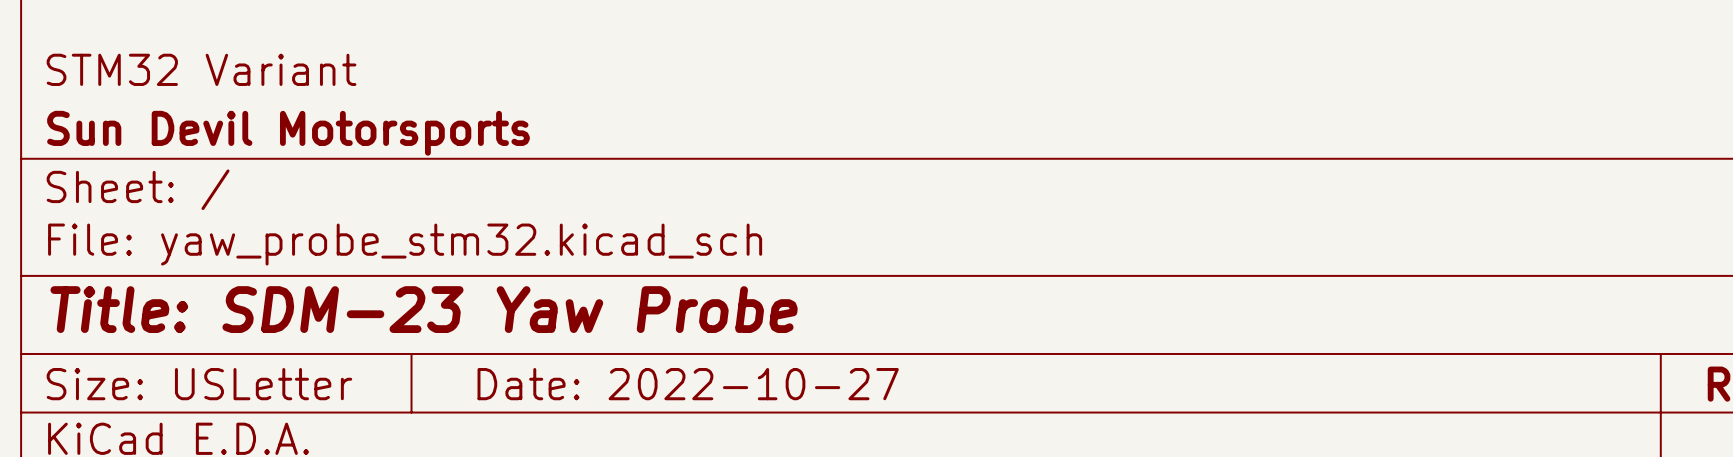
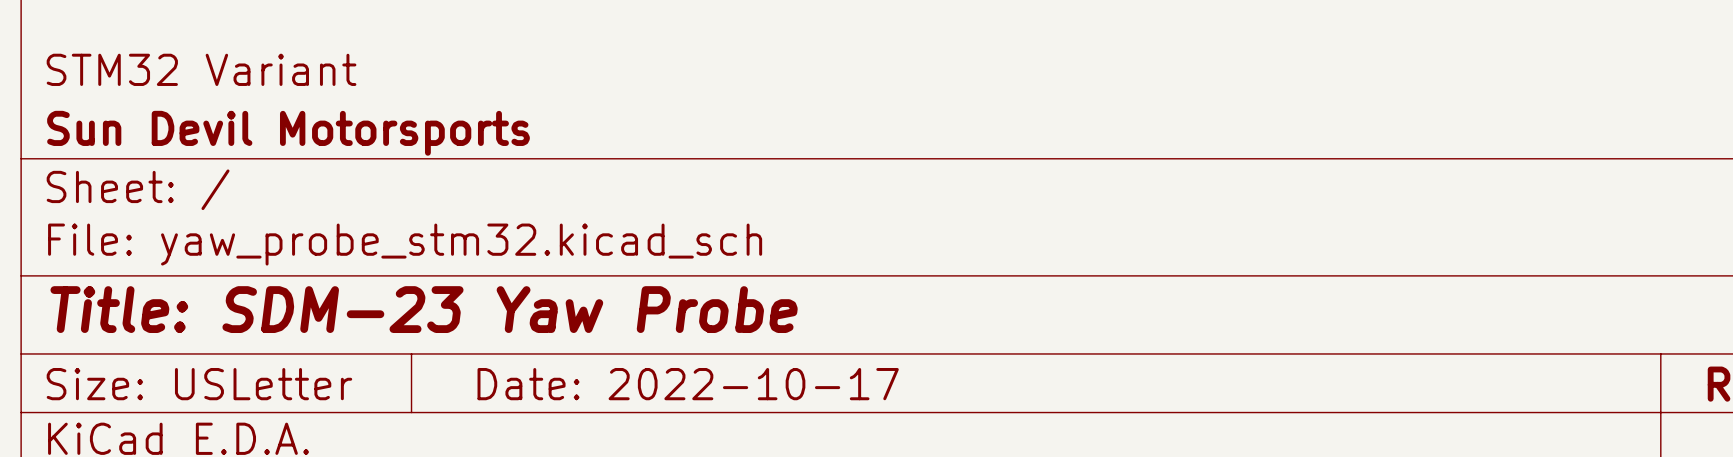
title block: Date: 2022-10-27 (688, 384) -> Date: 2022-10-17 (688, 384)

